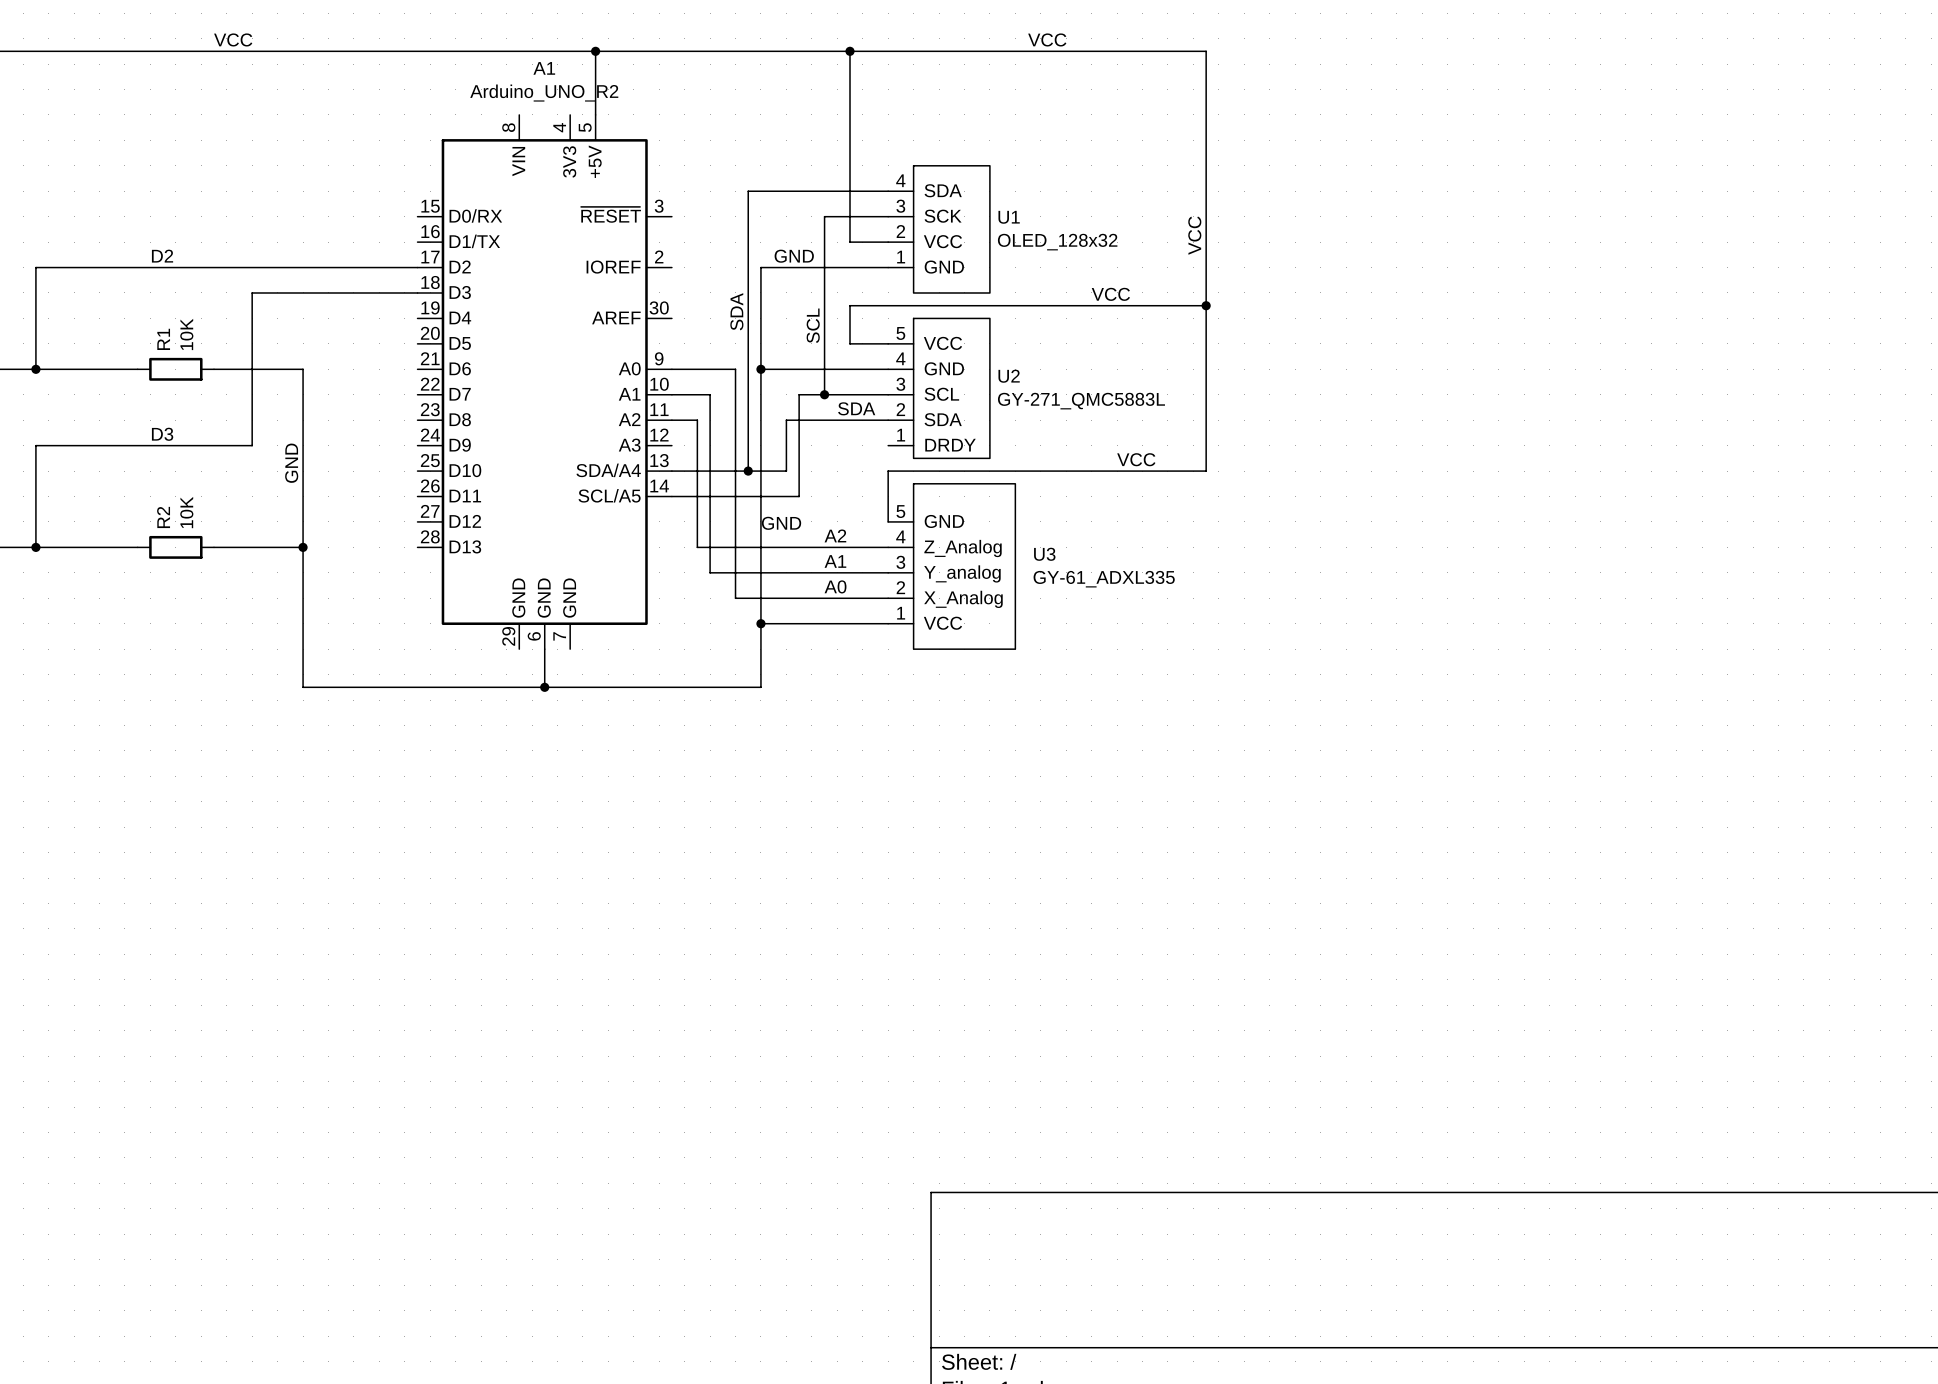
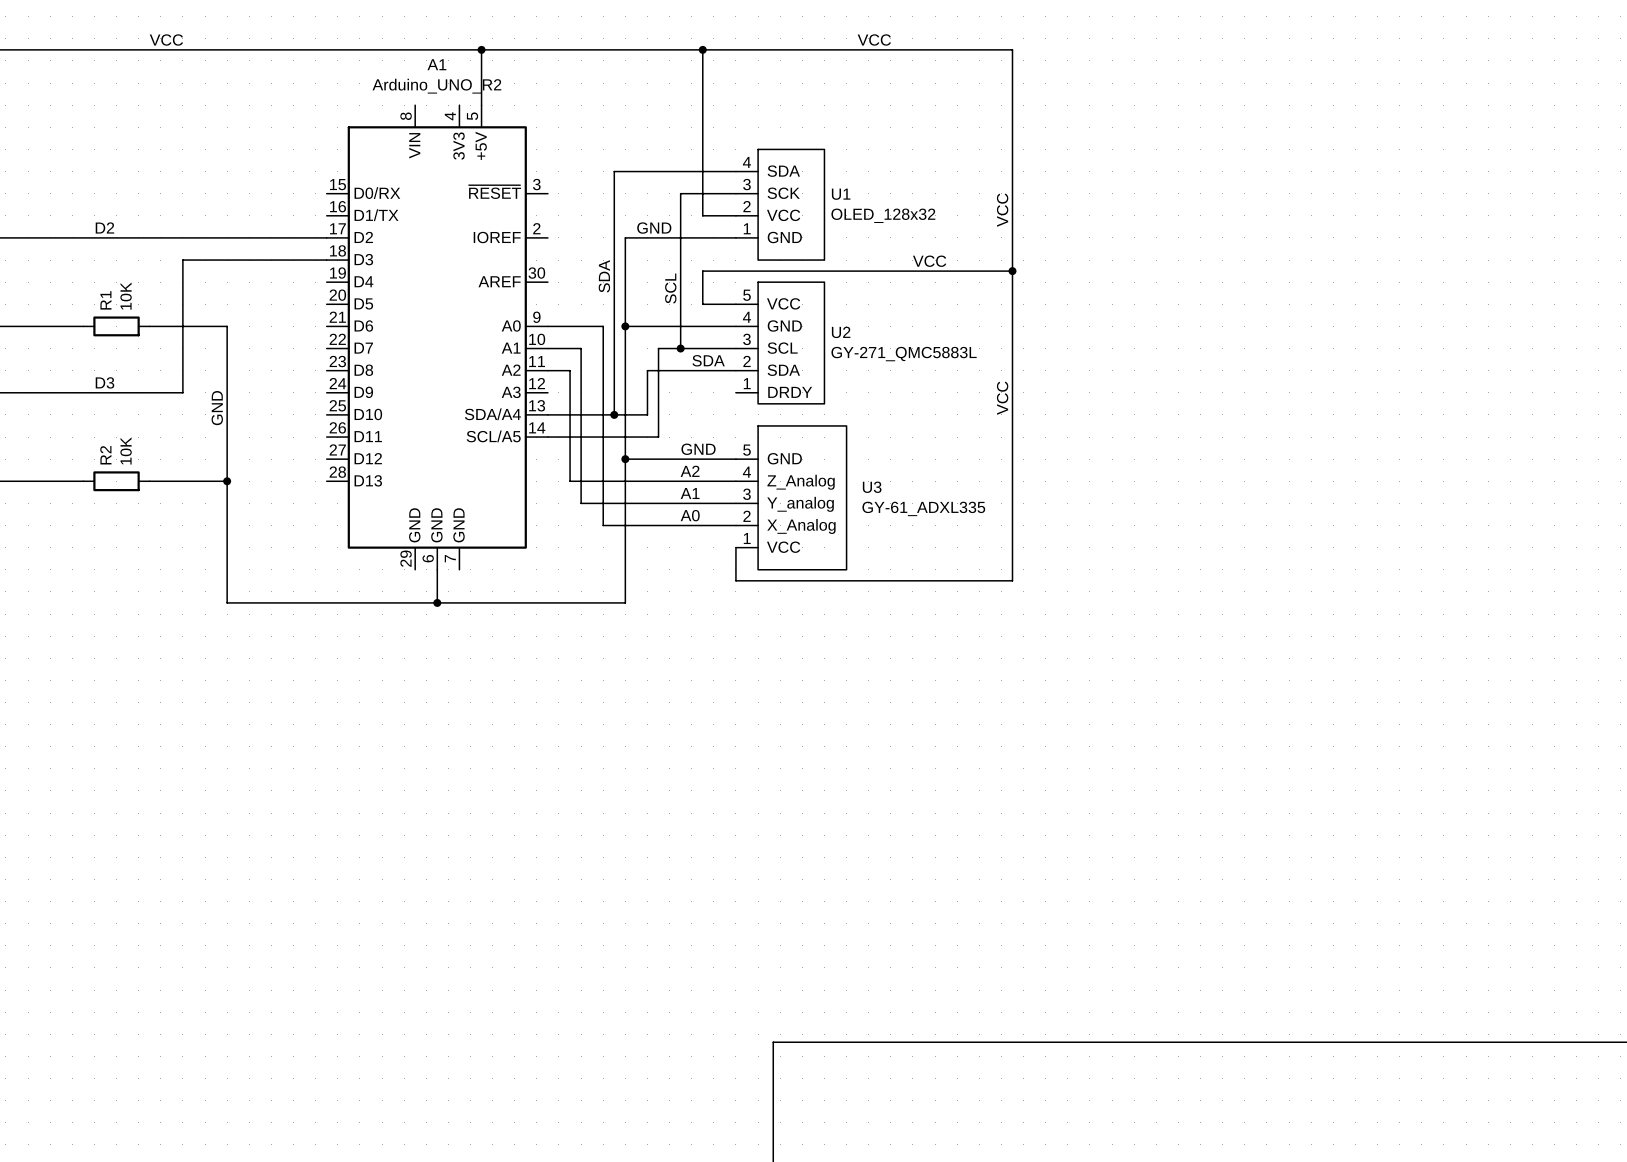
label rotation: 0° (1136, 459) -> 90° counterclockwise (1002, 398)
label position: VCC (1136, 459) -> VCC (1002, 398)
wire: (1206, 471) (888, 471) (888, 521) -> (1012, 414) (1012, 580) (735, 580) (735, 547)
junction: none -> (625, 459)
label position: GND (781, 523) -> GND (698, 449)
wire: (760, 623) (888, 623) -> (625, 459) (735, 459)
junction: (760, 623) -> none

